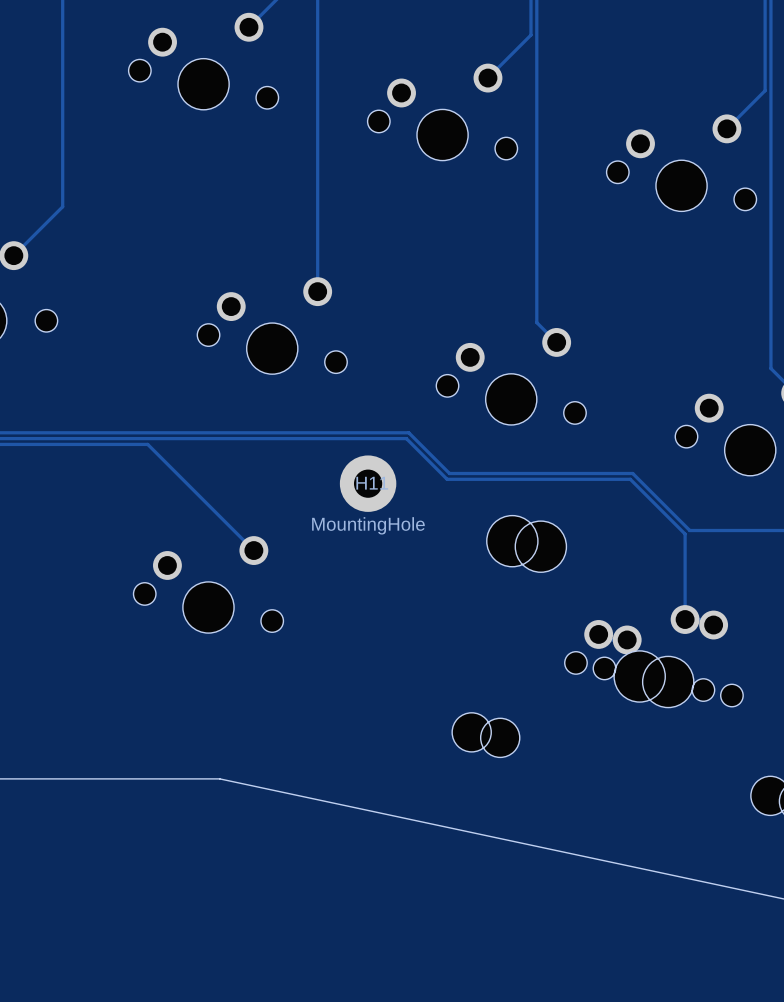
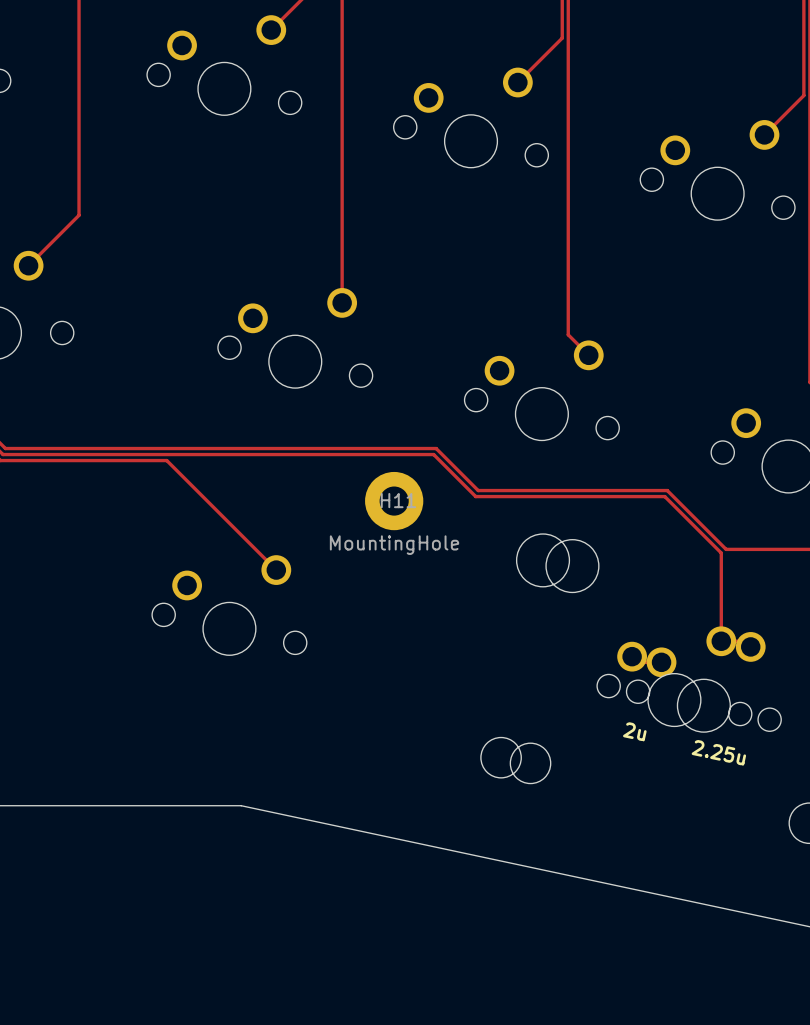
text: none -> 2u (634, 731)
text: none -> 2.25u (718, 752)

